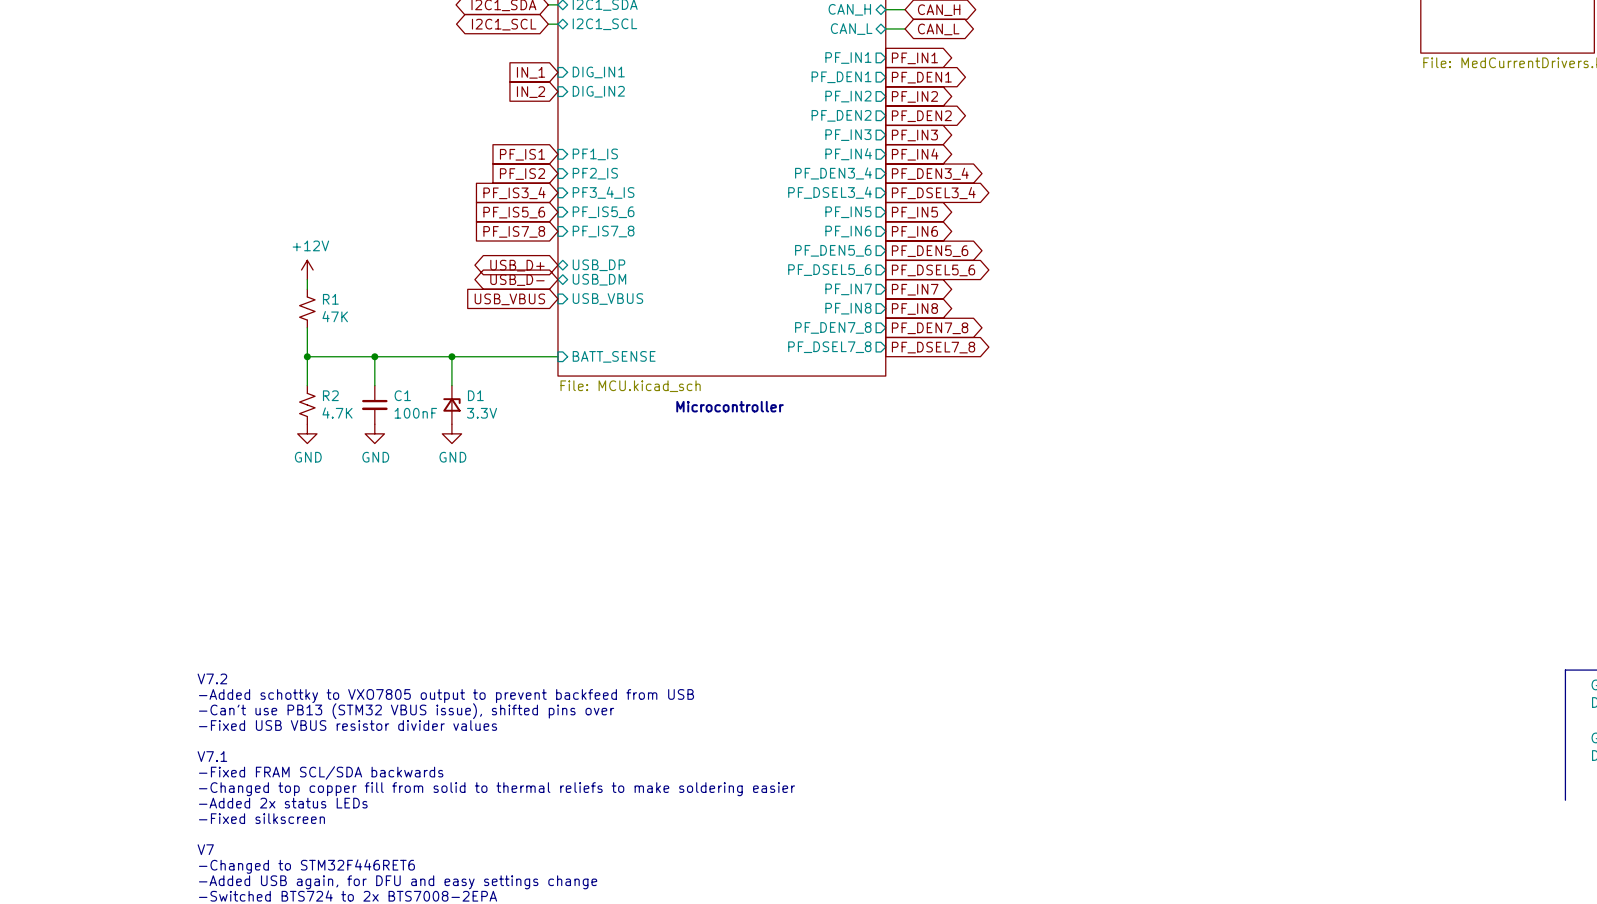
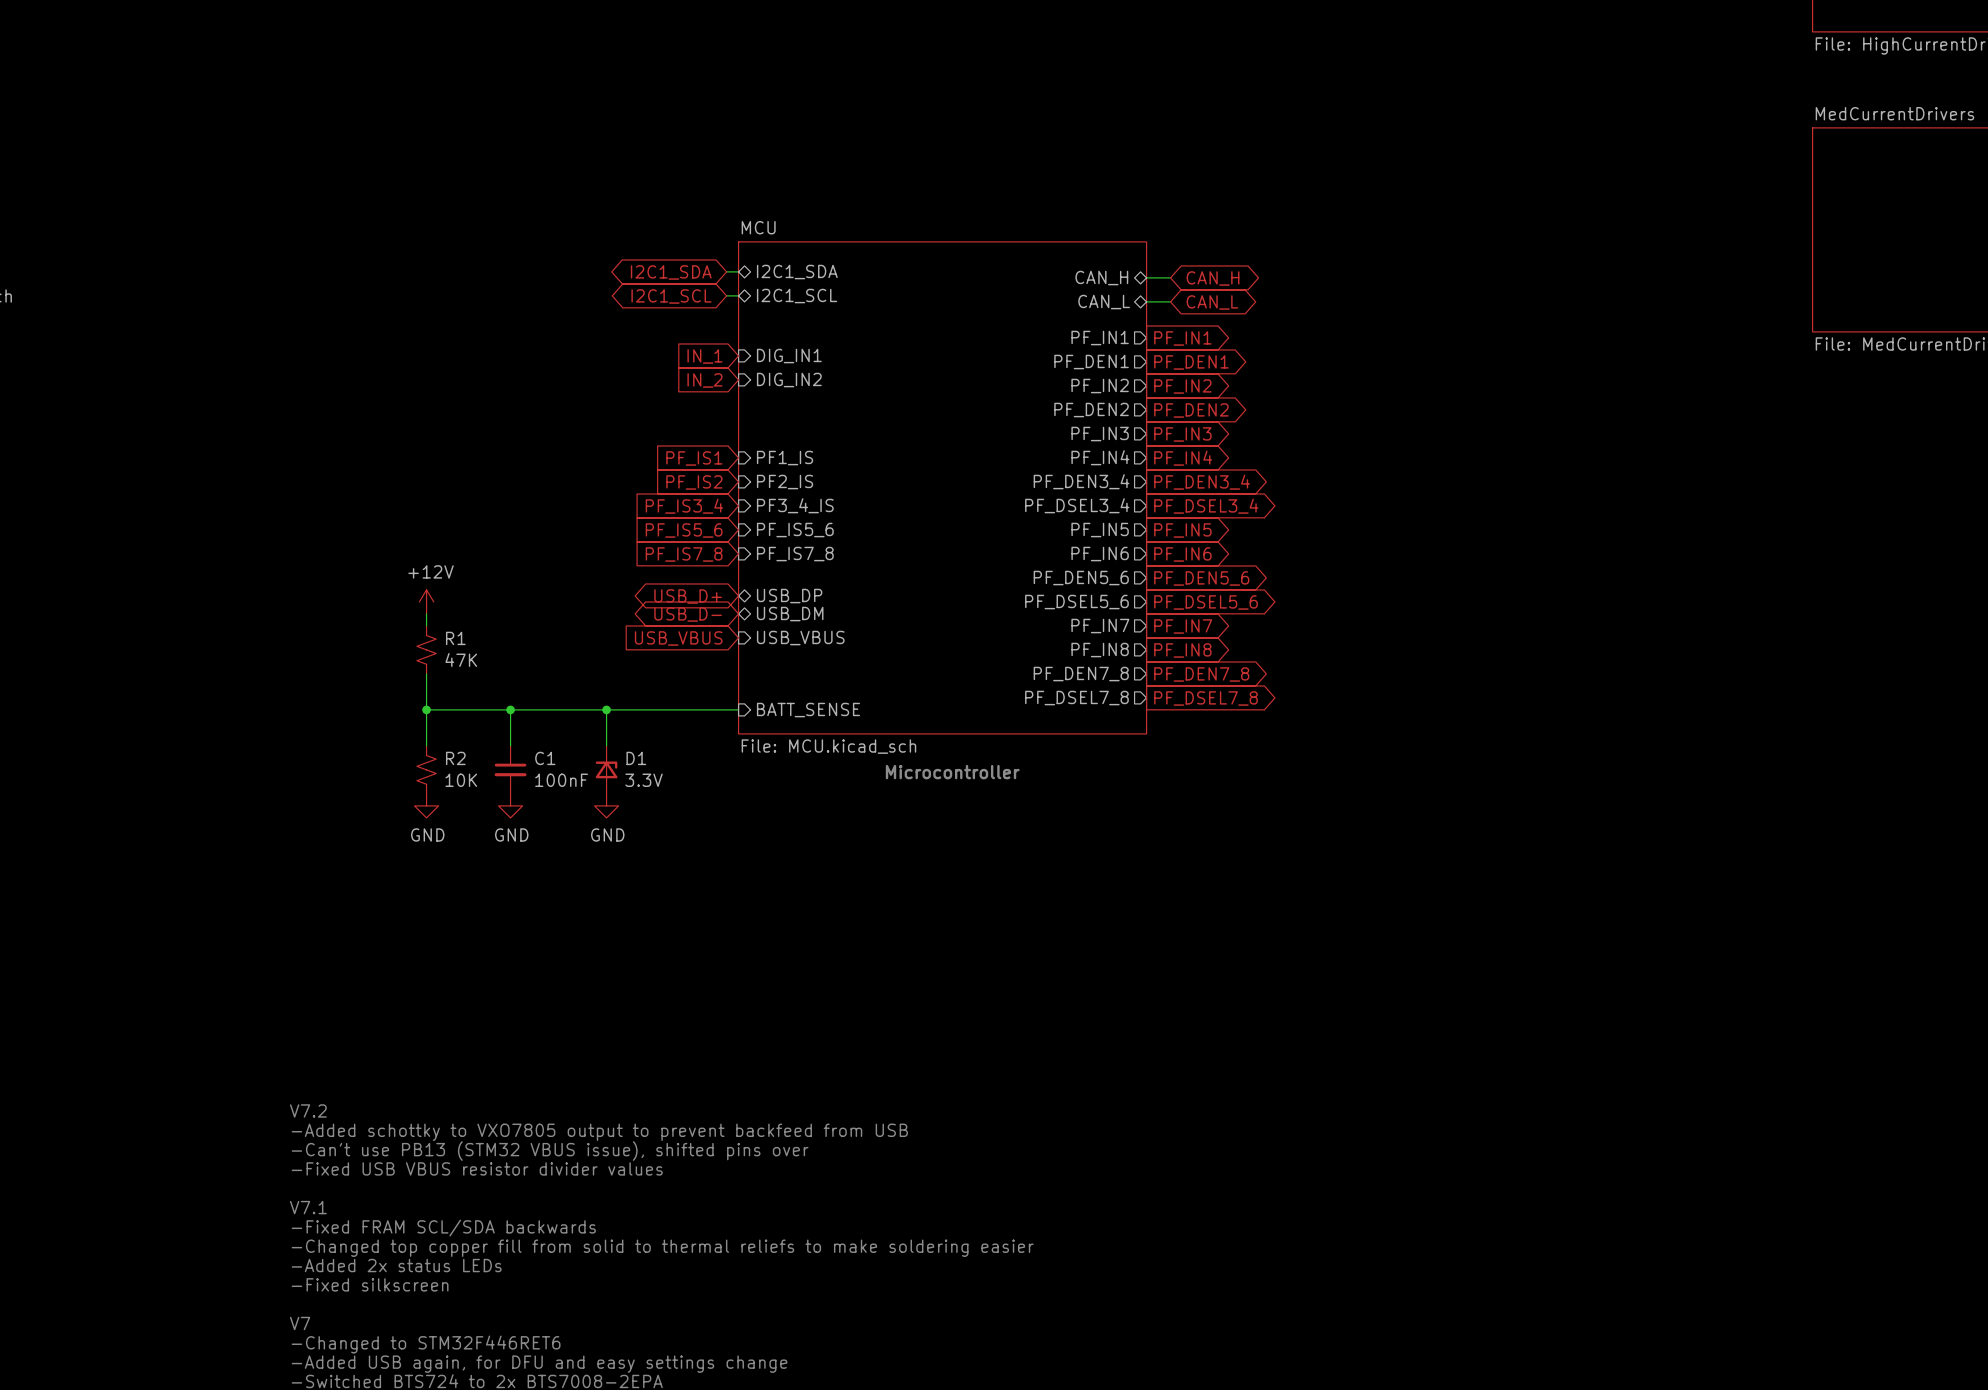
R2 value: 4.7K (337, 413) -> 10K (461, 780)

